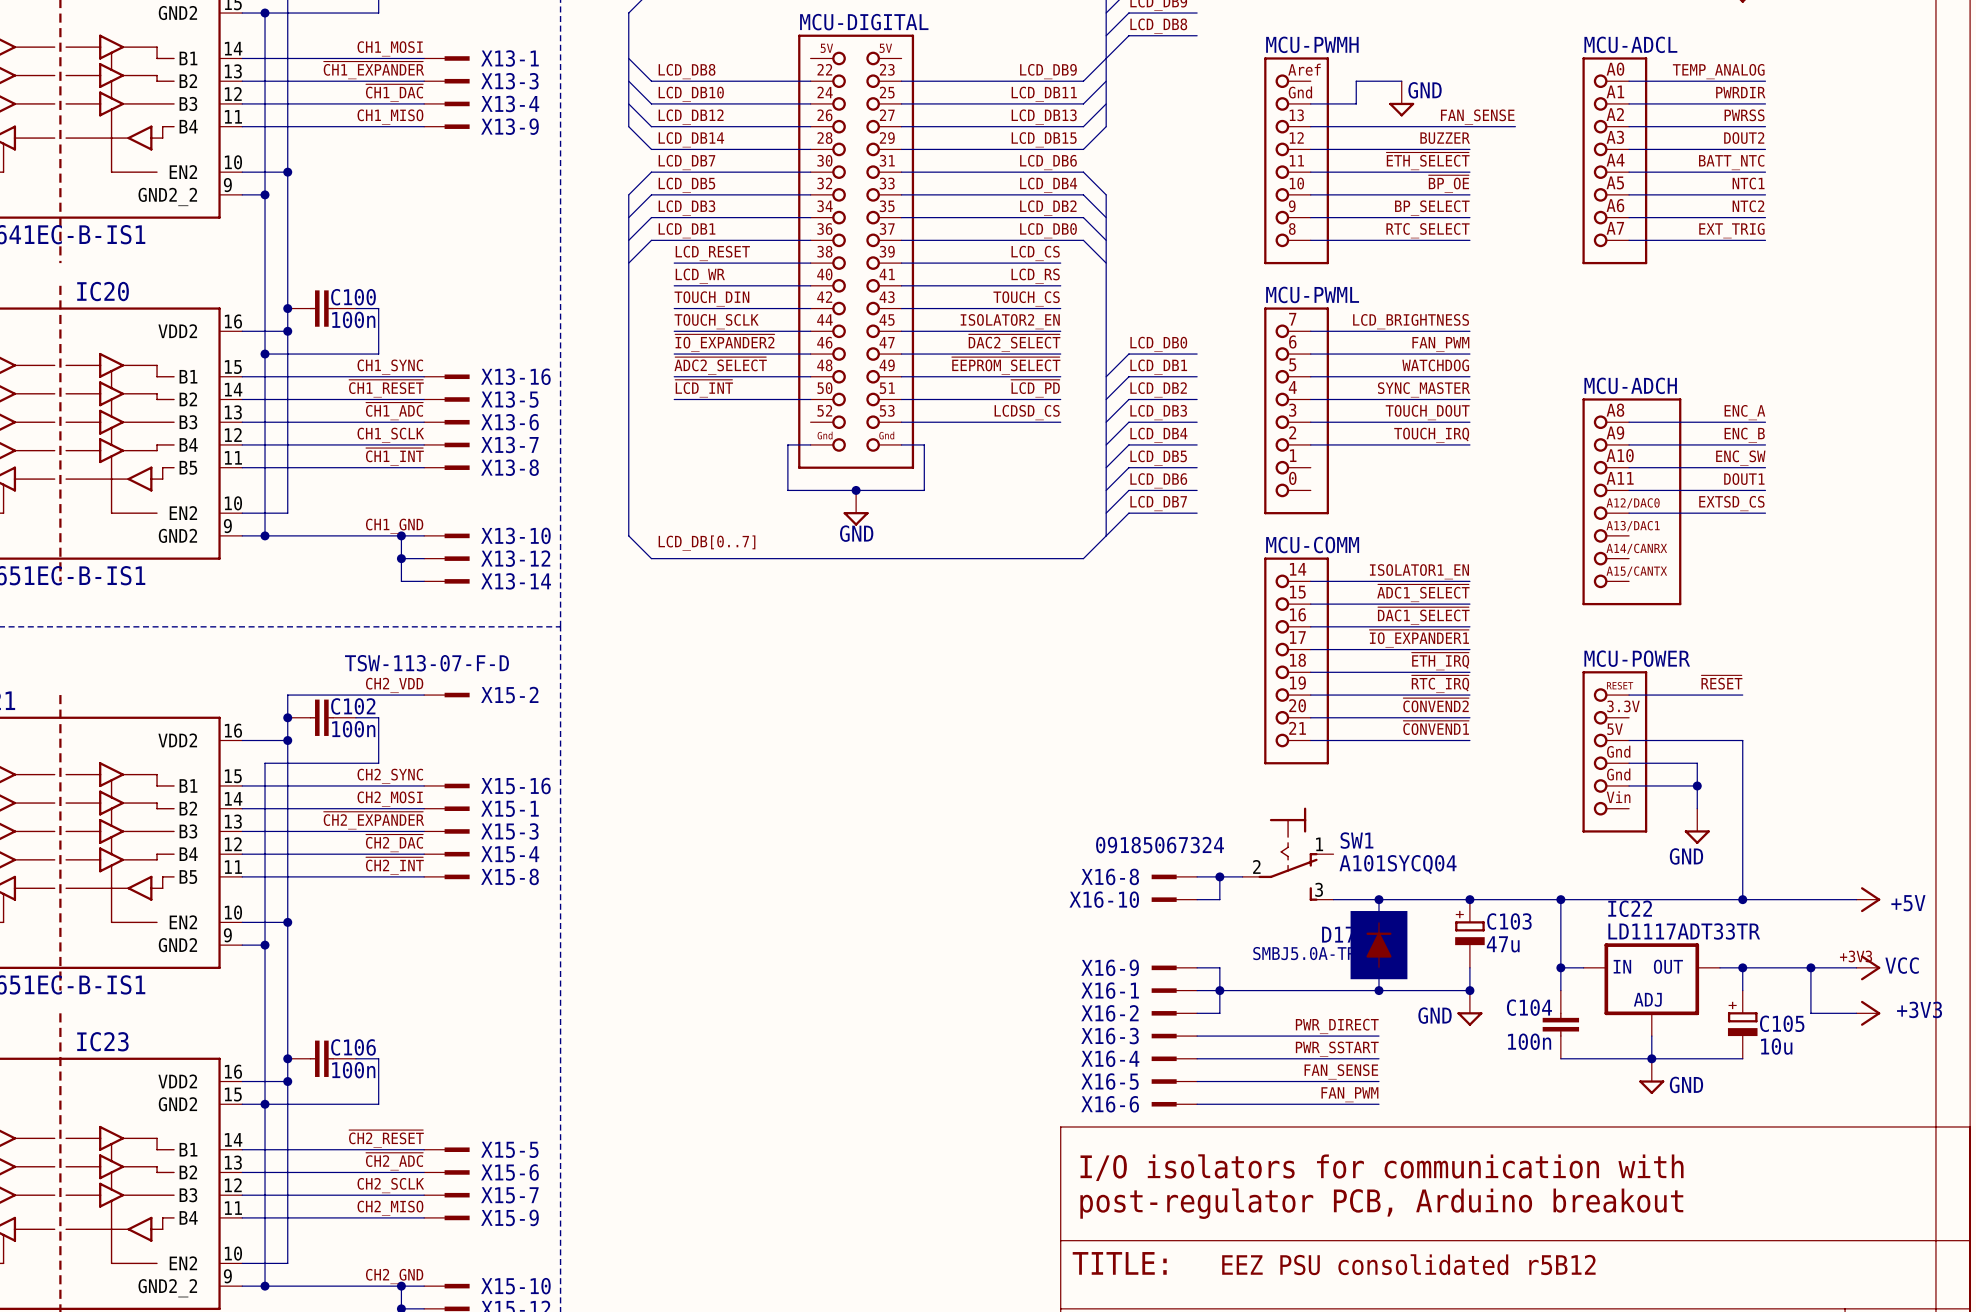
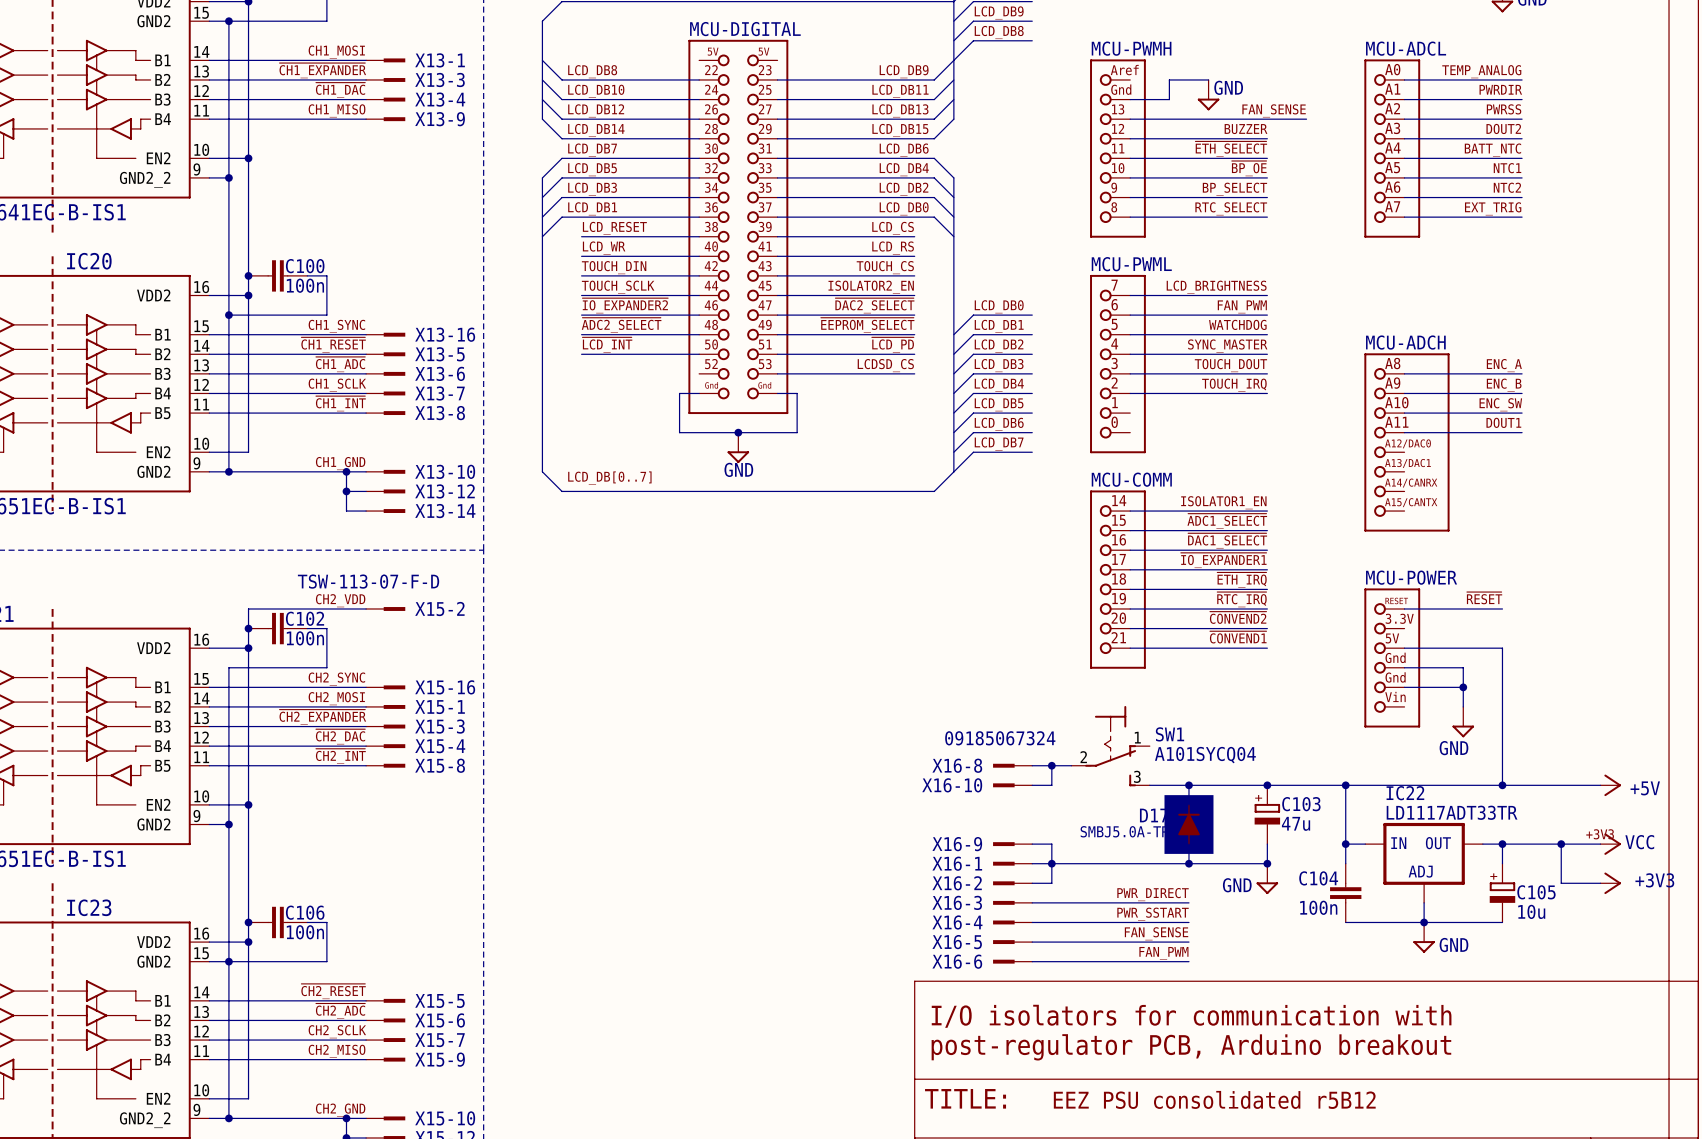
label: EXTSD_CS (1731, 503) -> none
wire: (1629, 513) (1765, 513) -> none

